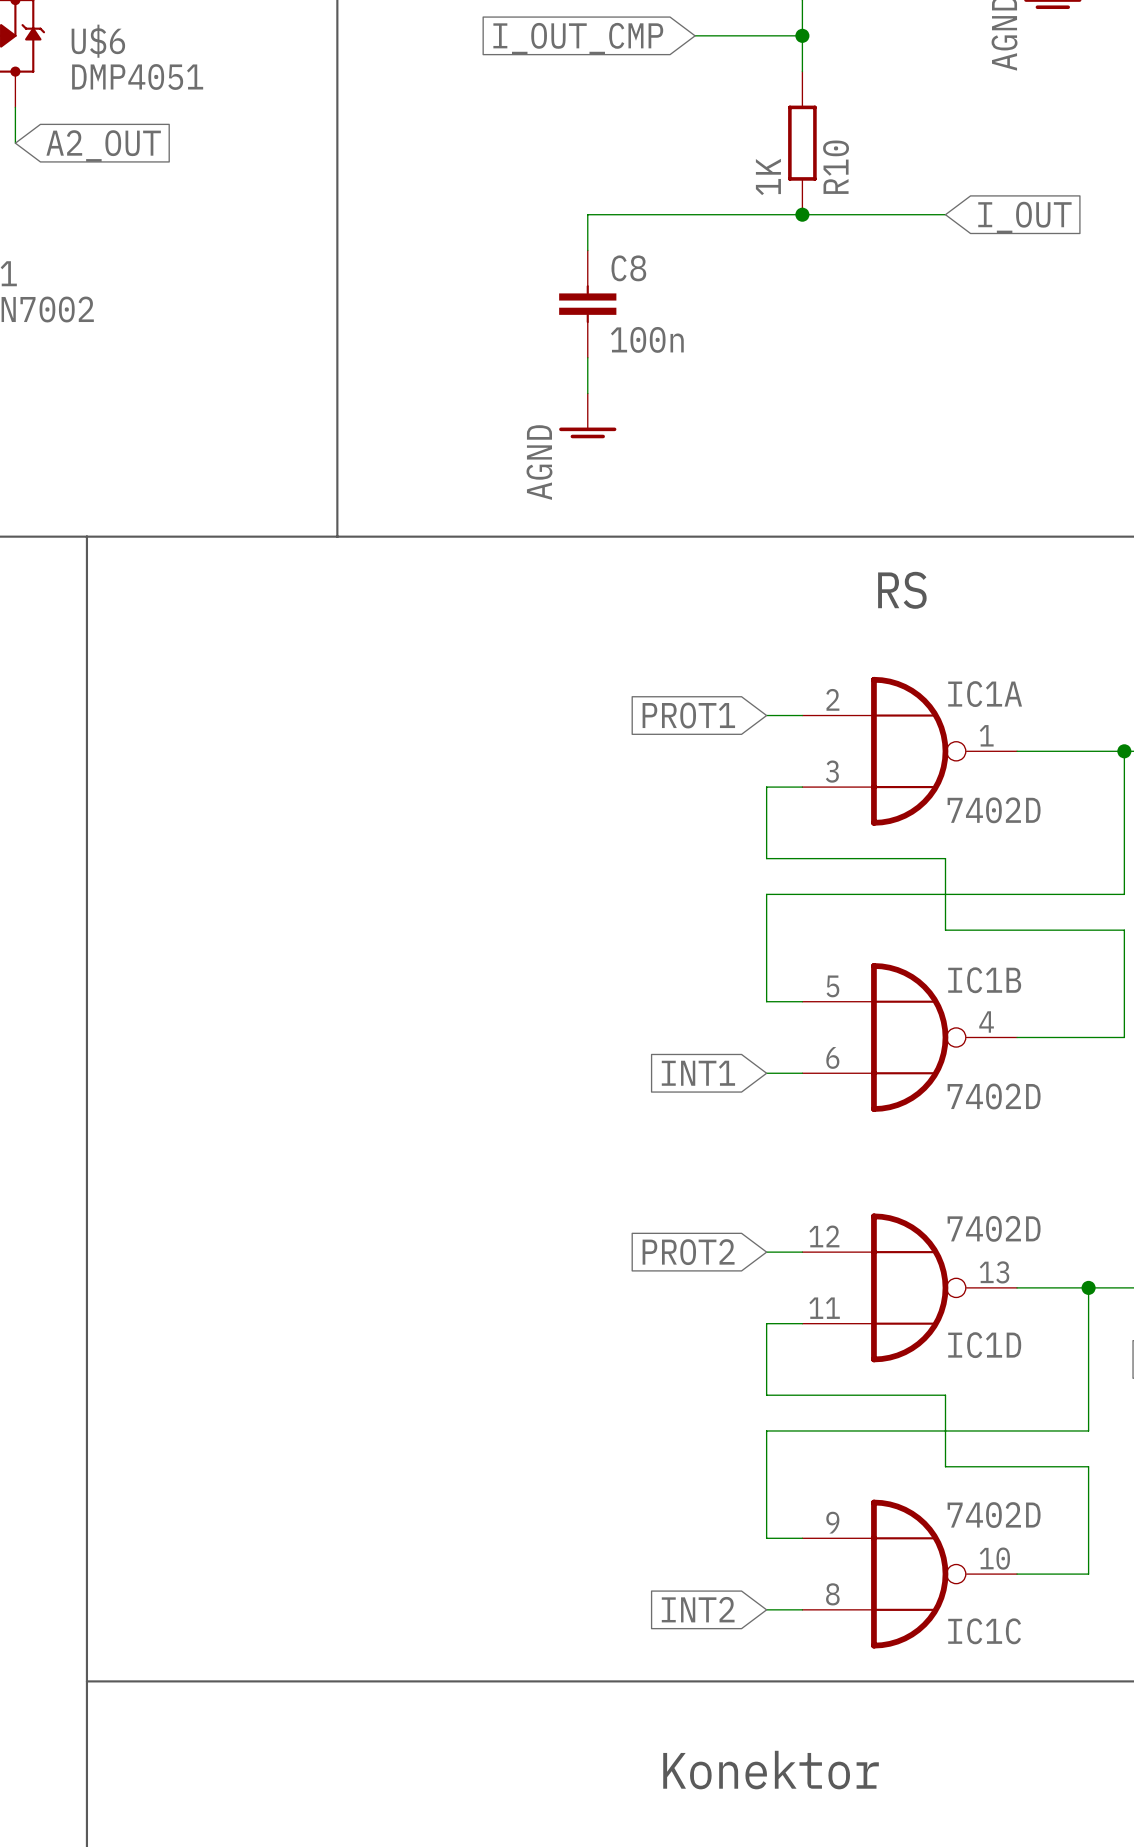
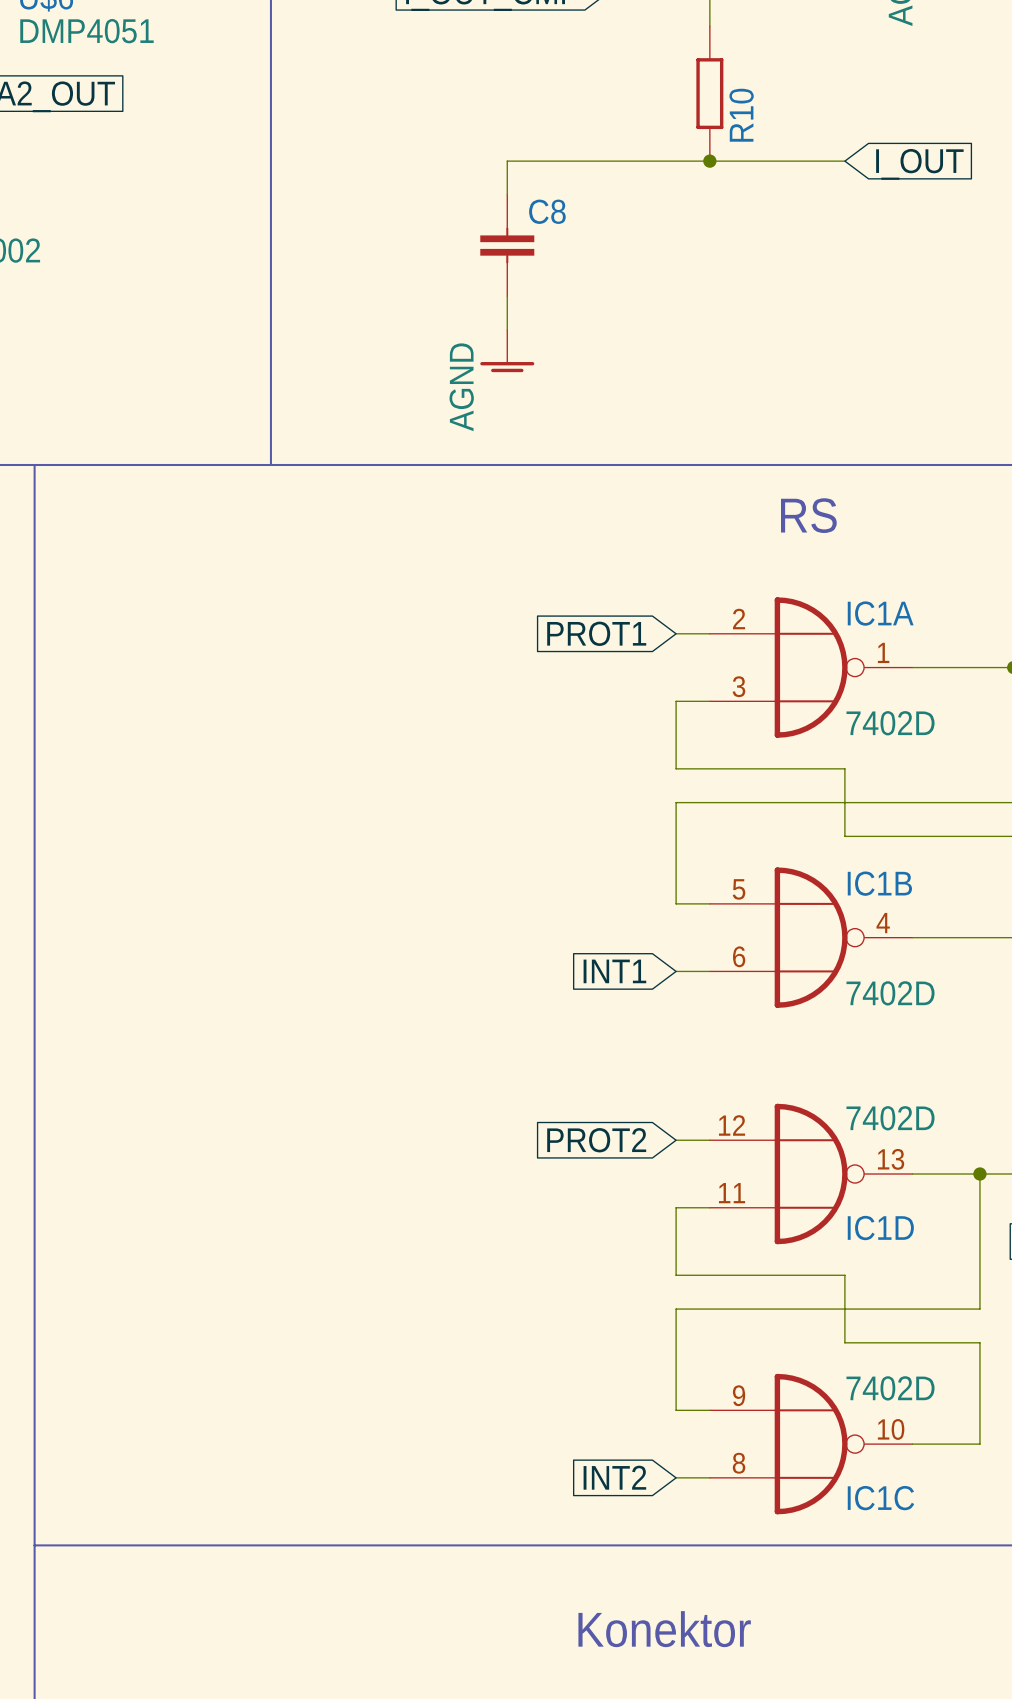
R10 value: 1K (768, 176) -> none
C8 value: 100n (647, 339) -> none

